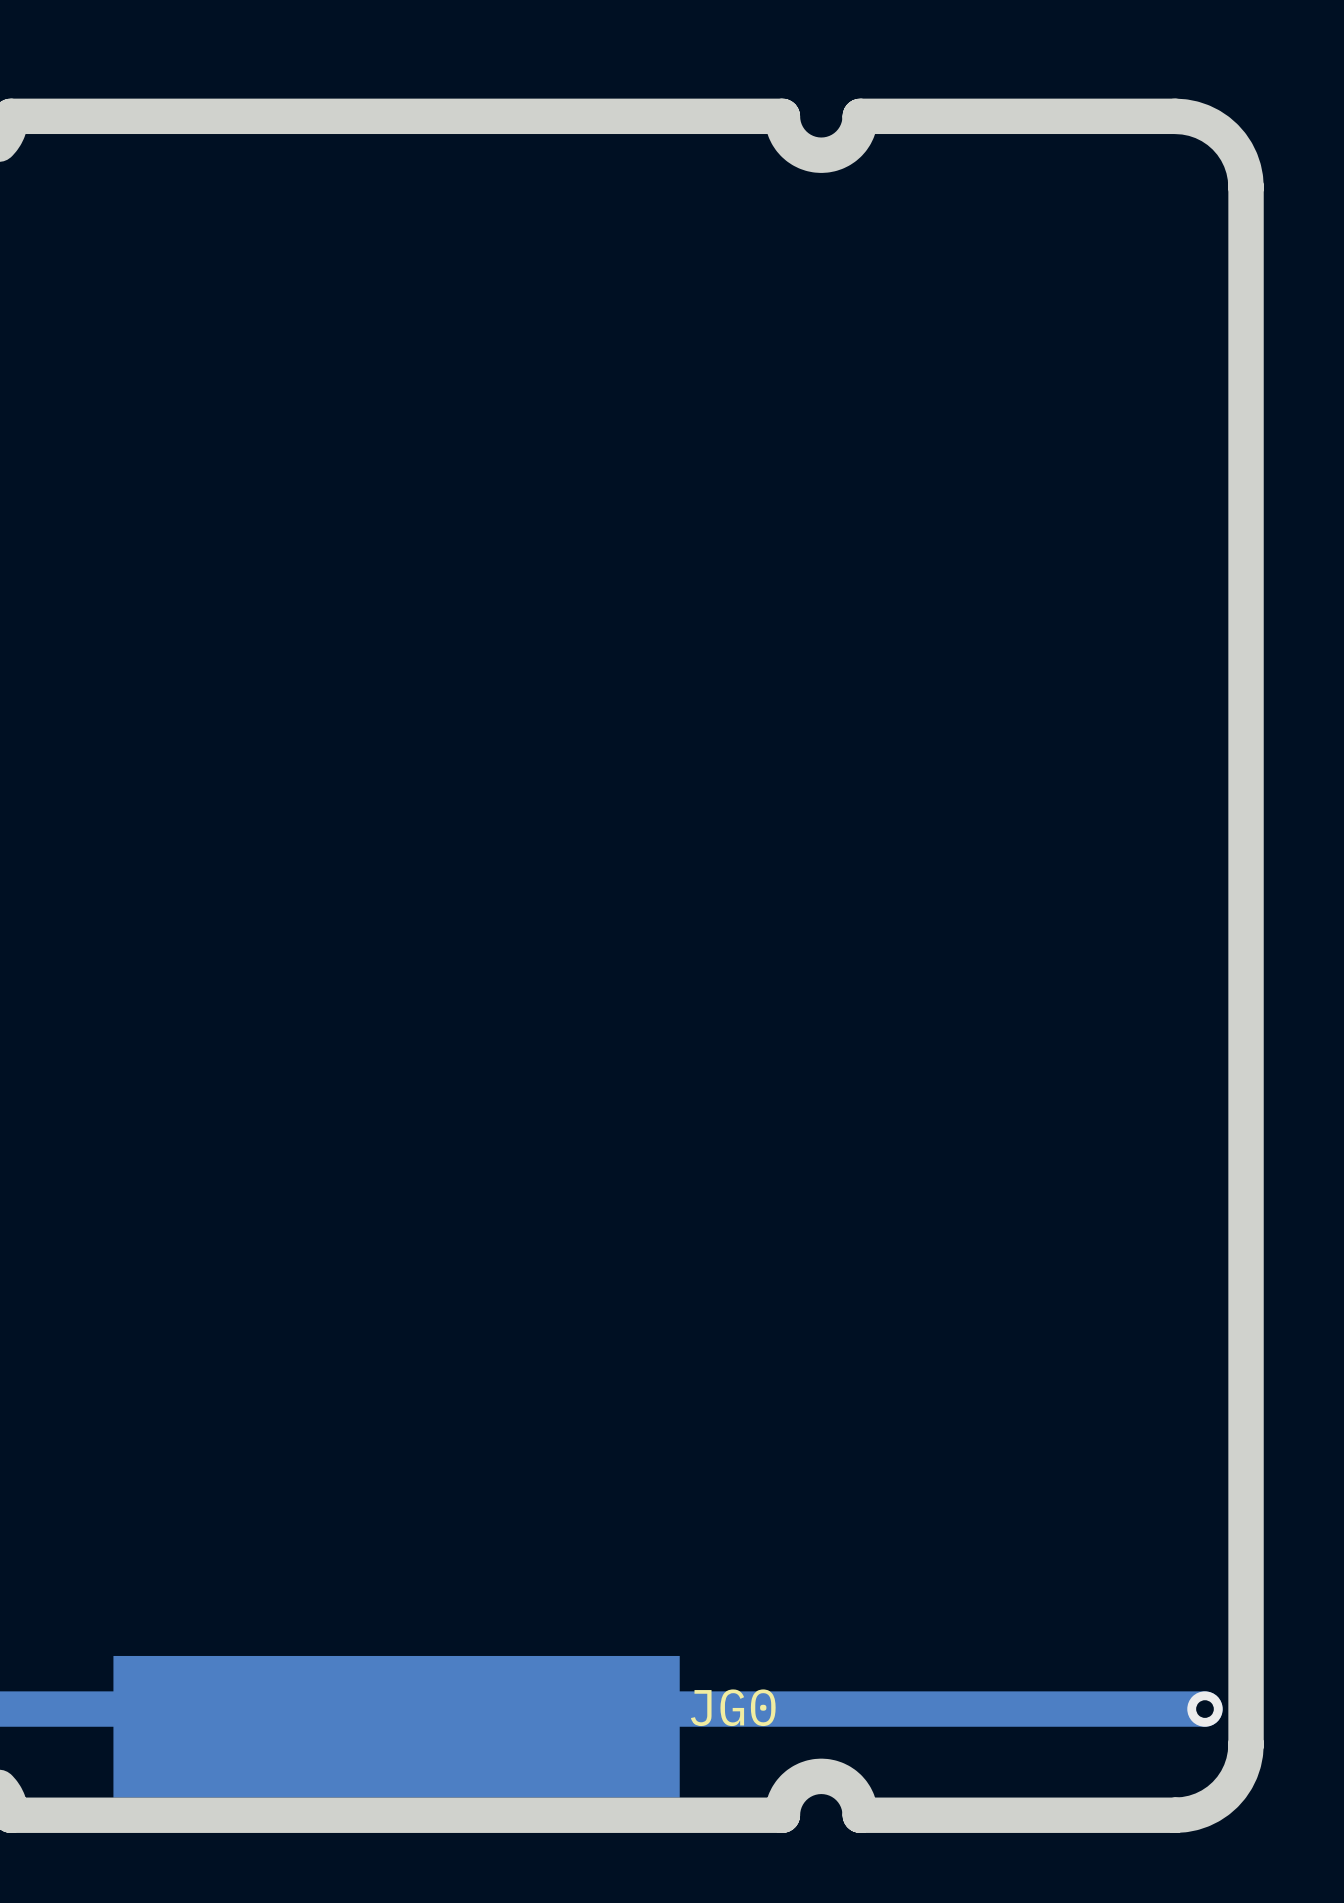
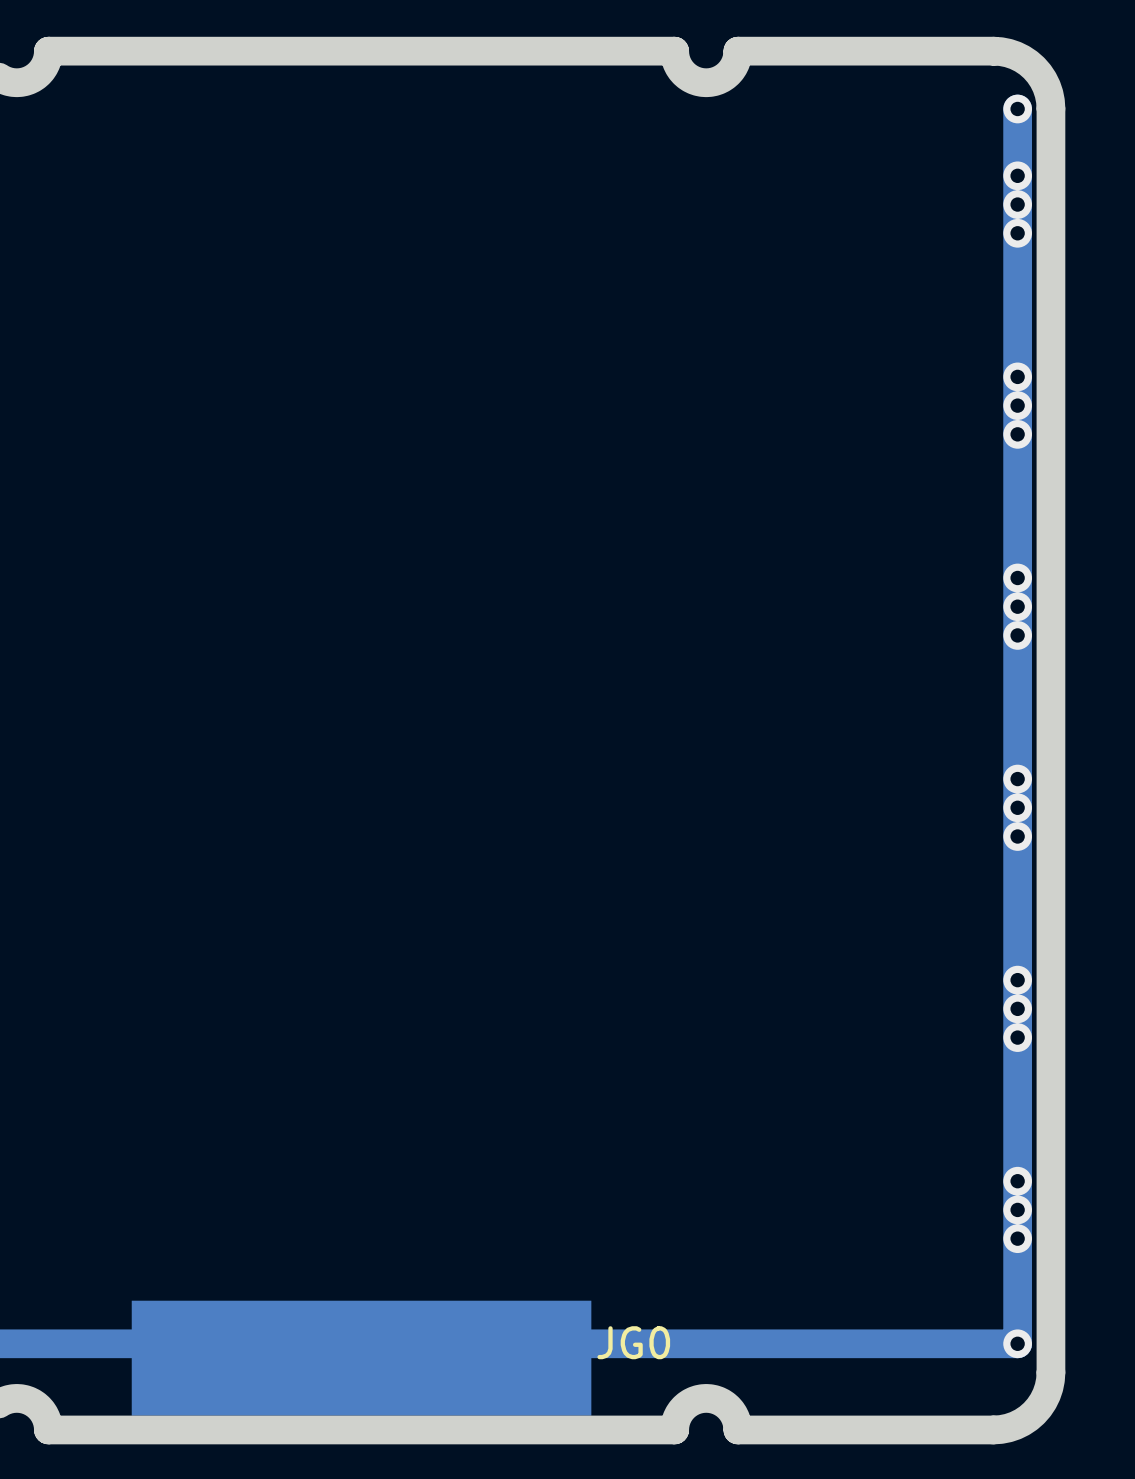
track: none -> (1017, 108) (1017, 1343)
via: none -> (1017, 108)
via: none -> (1017, 175)
via: none -> (1017, 204)
via: none -> (1017, 233)
via: none -> (1017, 376)
via: none -> (1017, 405)
via: none -> (1017, 434)
via: none -> (1017, 577)
via: none -> (1017, 606)
via: none -> (1017, 635)
via: none -> (1017, 779)
via: none -> (1017, 807)
via: none -> (1017, 836)
via: none -> (1017, 980)
via: none -> (1017, 1008)
via: none -> (1017, 1037)
via: none -> (1017, 1181)
via: none -> (1017, 1209)
via: none -> (1017, 1238)

